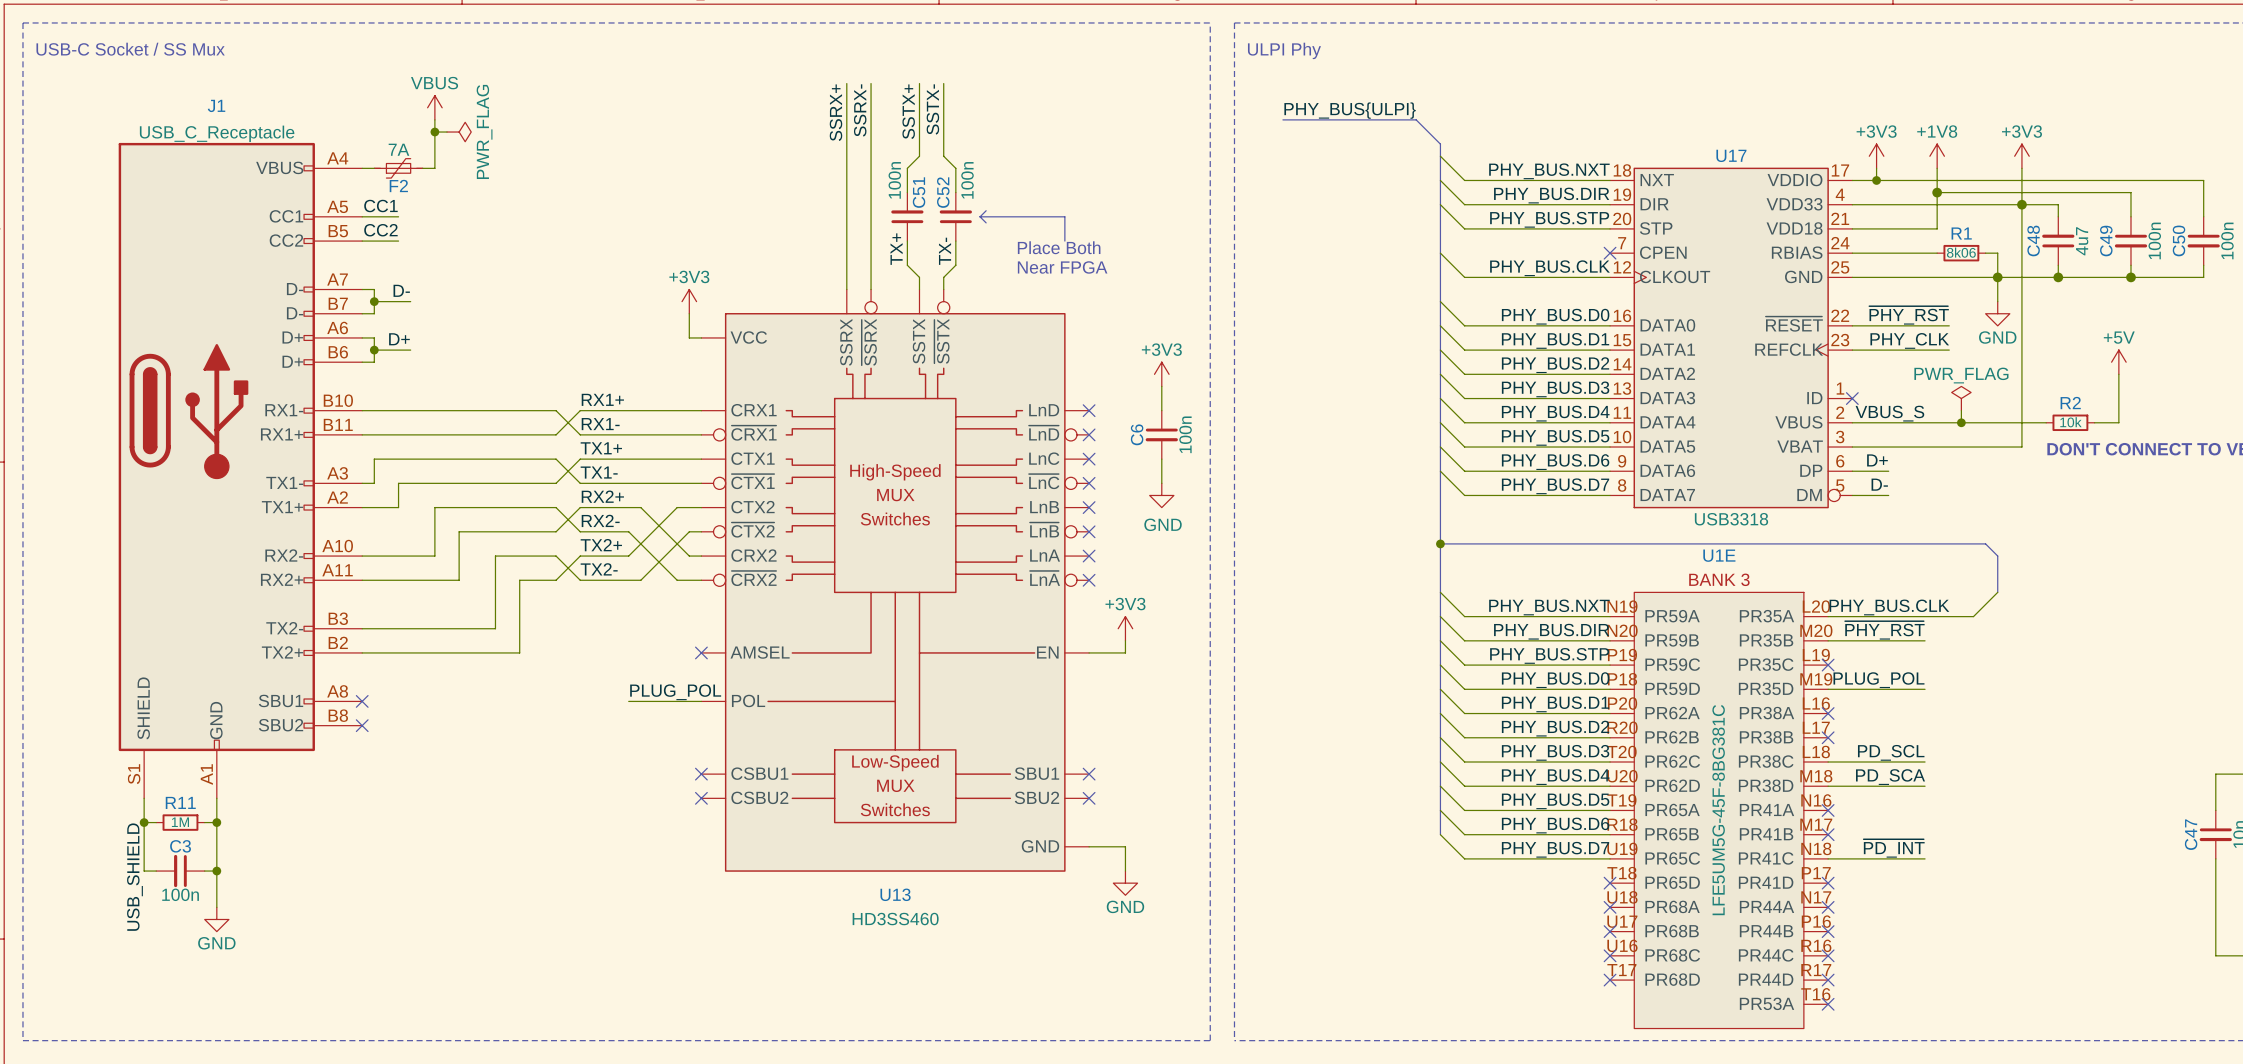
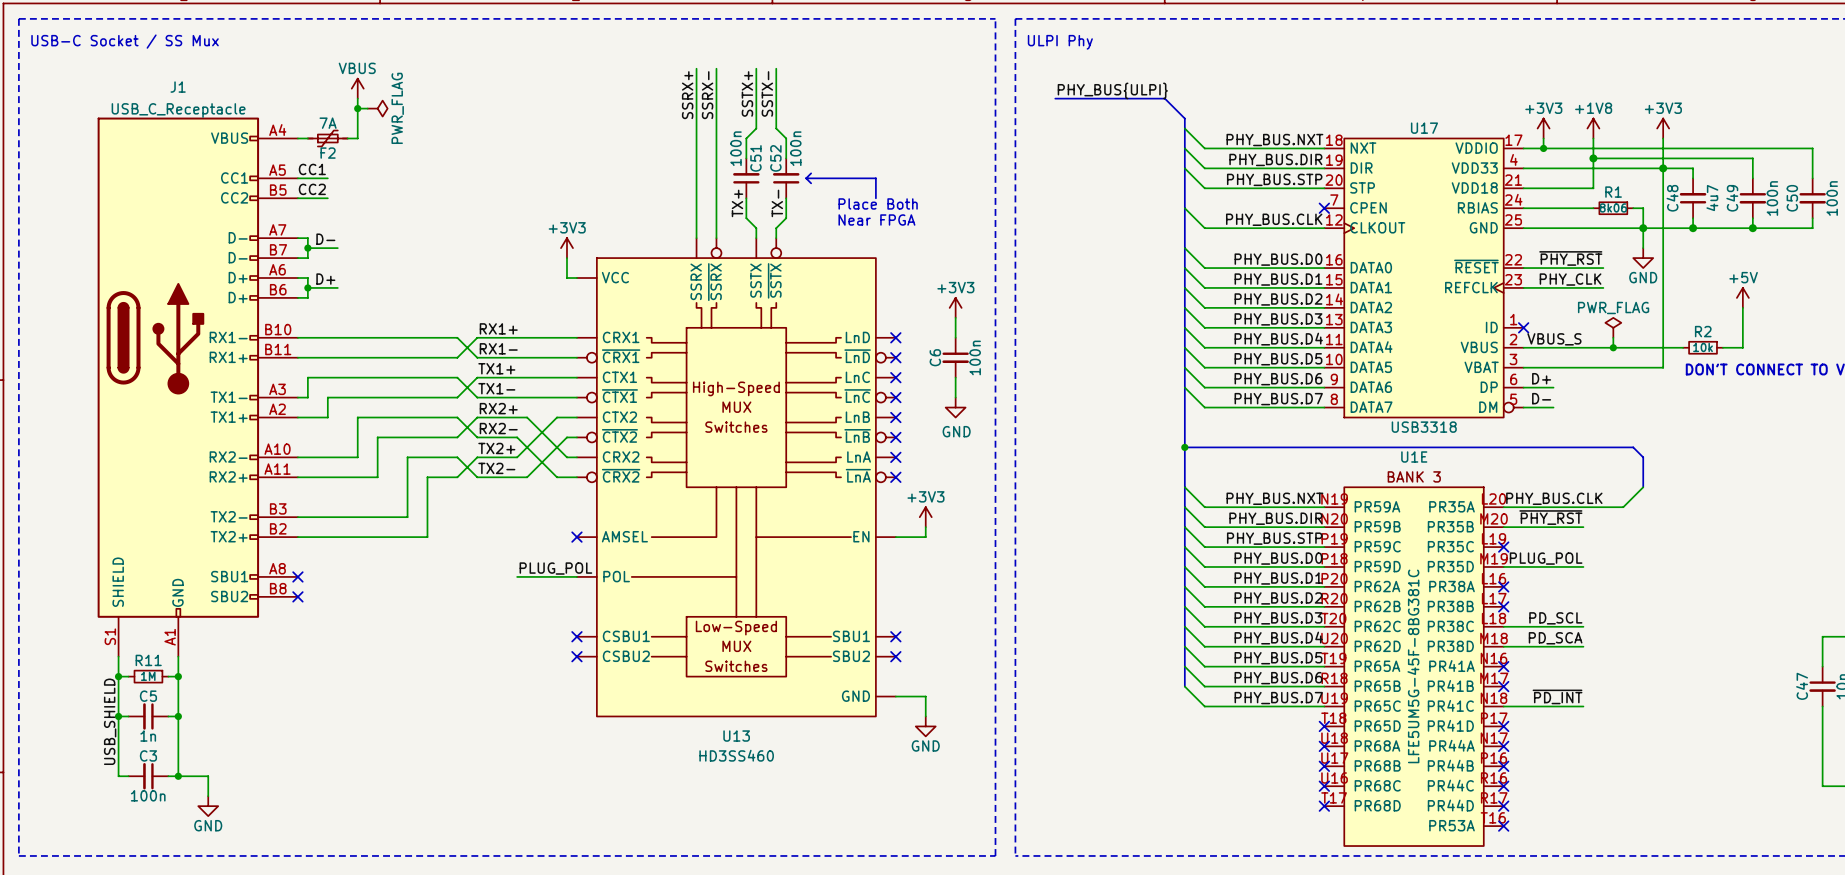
C3 name: C3 (180, 846) -> C5 (148, 696)
wire: none -> (118, 716) (118, 776) (128, 776)
junction: none -> (118, 716)
C3 value: 100n (180, 894) -> 1n (148, 736)
power symbol position: GND (216, 919) -> GND (208, 806)
C3: none -> 100n (148, 776)
wire: none -> (168, 776) (208, 776) (208, 796)
junction: none -> (178, 776)

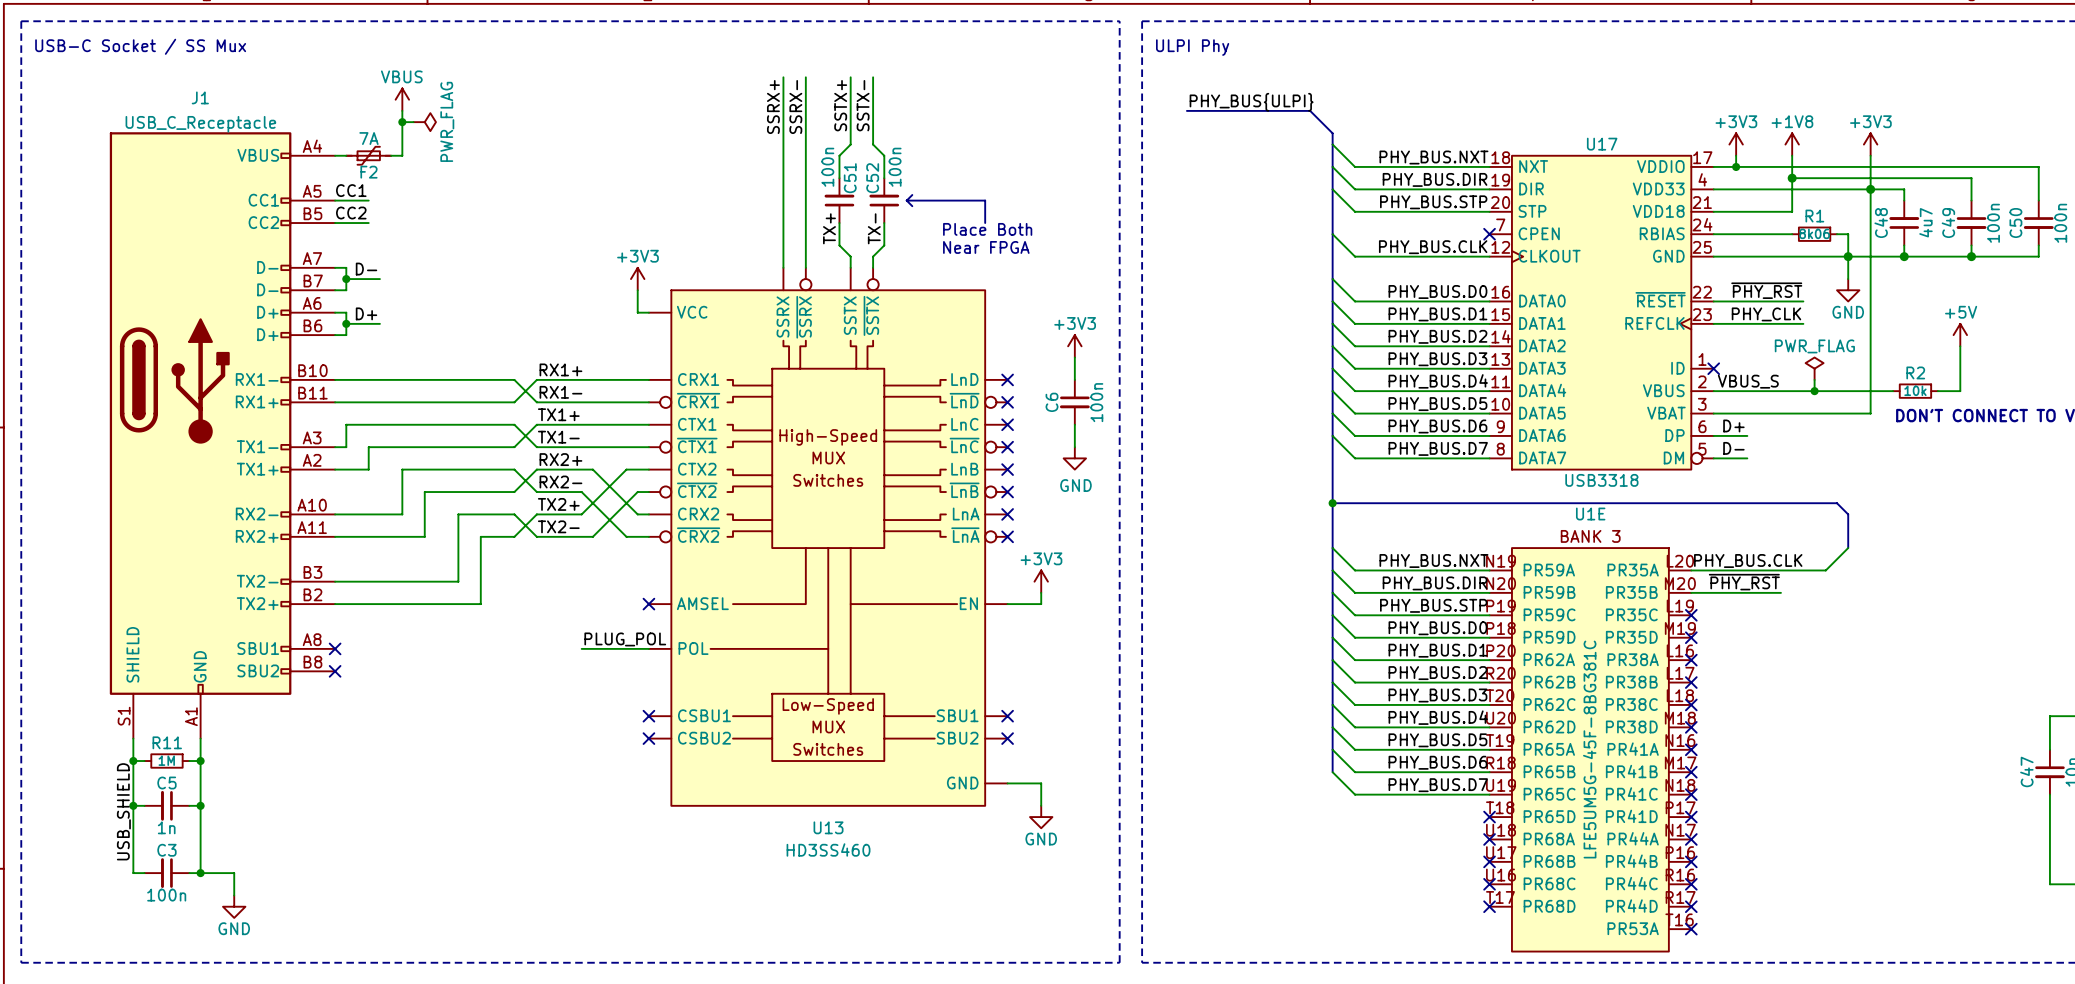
label: PLUG_POL (1546, 558) -> none
wire: (1503, 566) (1583, 566) -> none
no-connect mark: none -> (1691, 637)
label: PD_SCL (1555, 618) -> none
wire: (1503, 626) (1583, 626) -> none
no-connect mark: none -> (1691, 704)
label: PD_SCA (1555, 638) -> none
wire: (1503, 646) (1583, 646) -> none
no-connect mark: none -> (1691, 727)
label: ~{PD_INT} (1557, 696) -> none
wire: (1503, 706) (1583, 706) -> none
no-connect mark: none -> (1691, 794)

